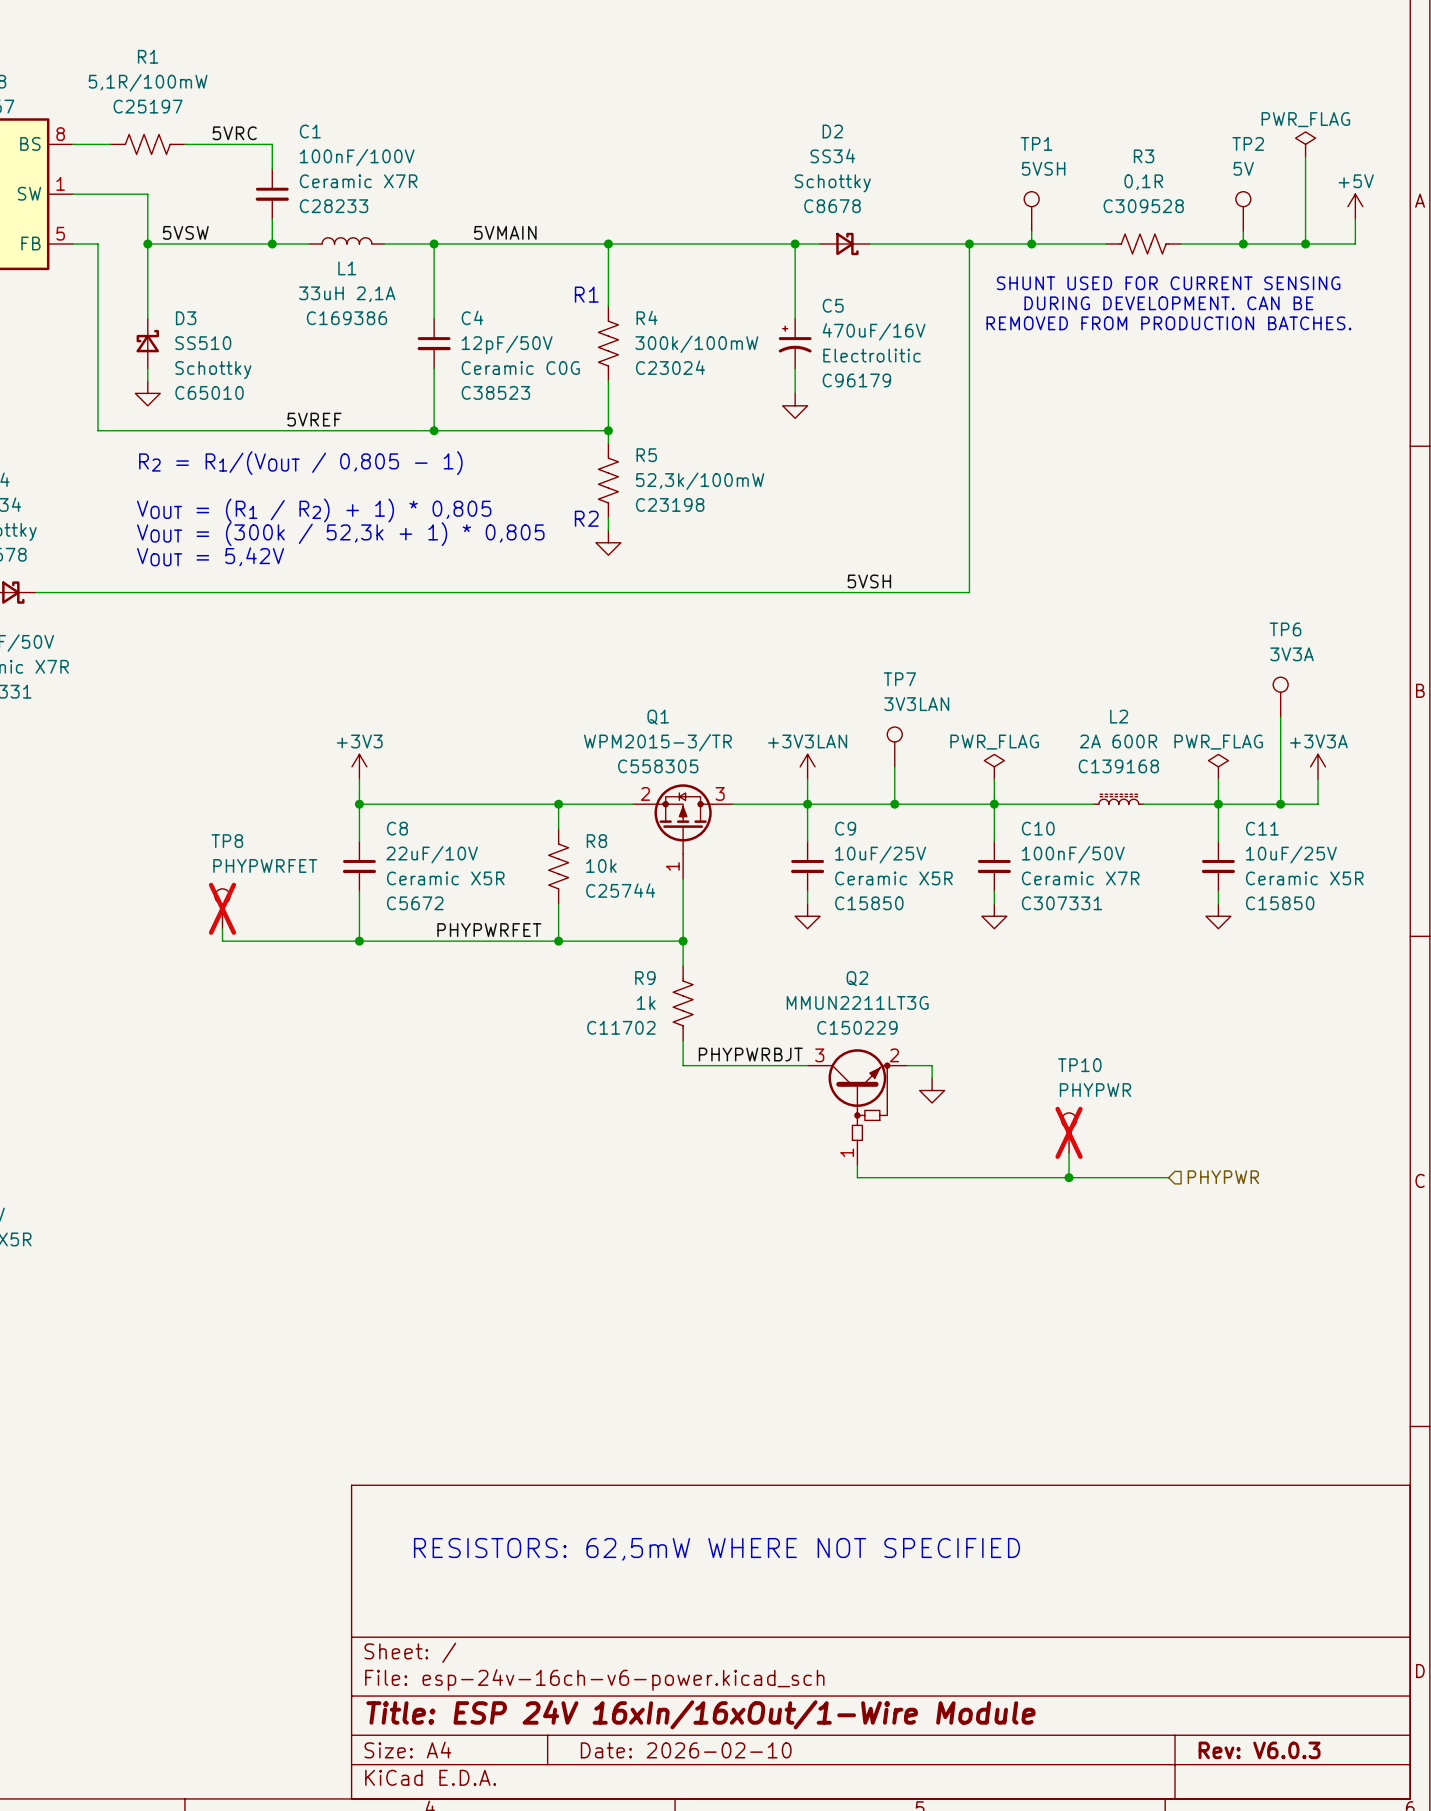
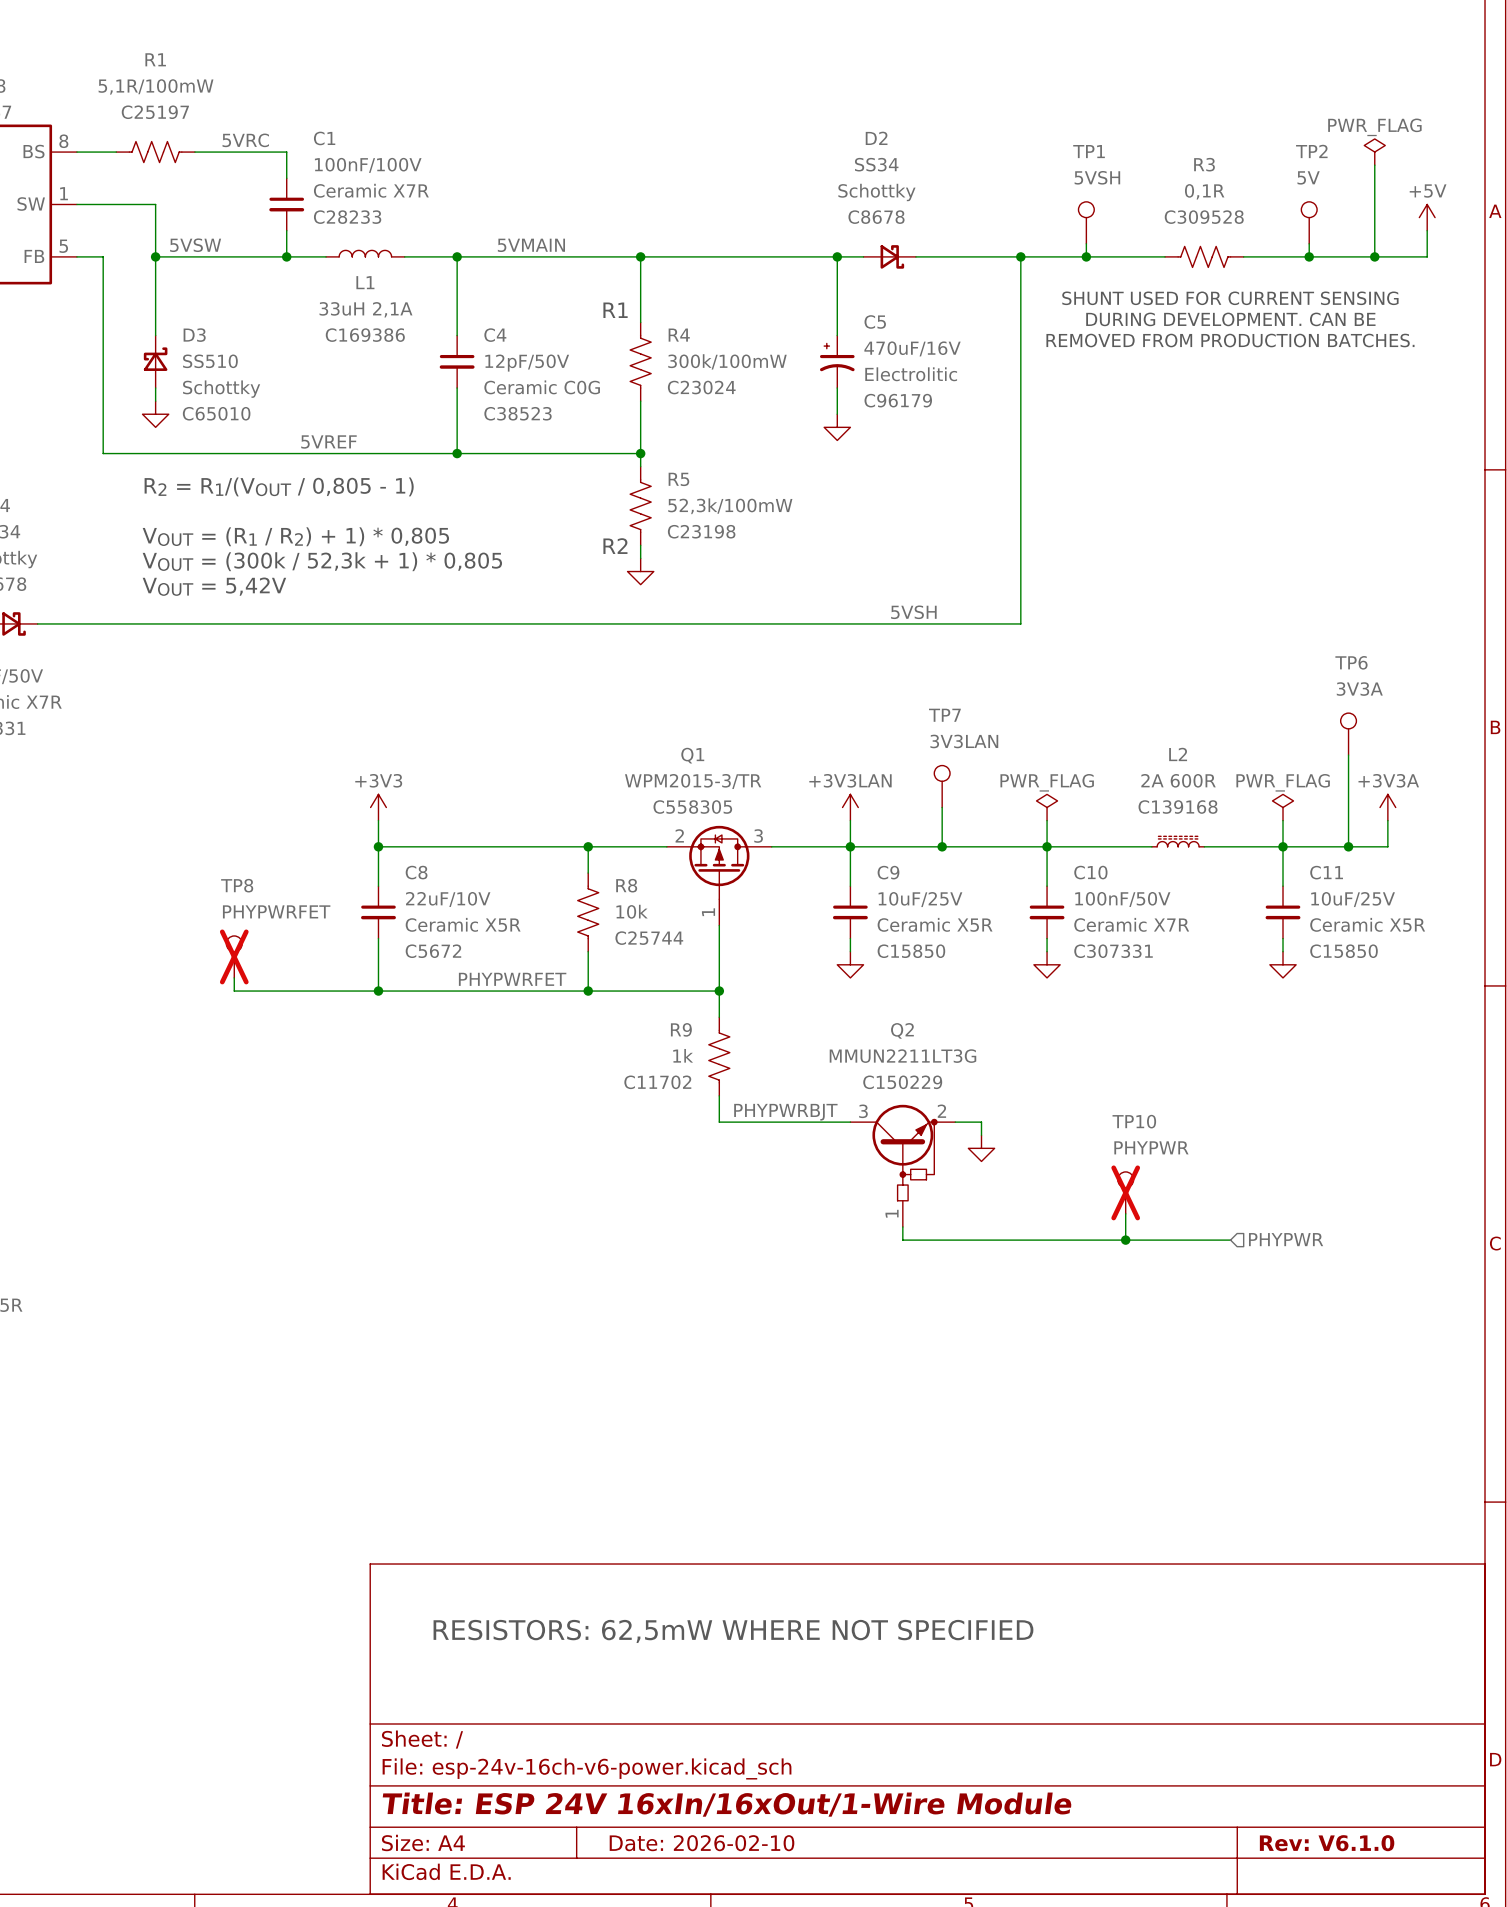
title block: Rev: V6.0.3 (1259, 1750) -> Rev: V6.1.0 (1327, 1843)

